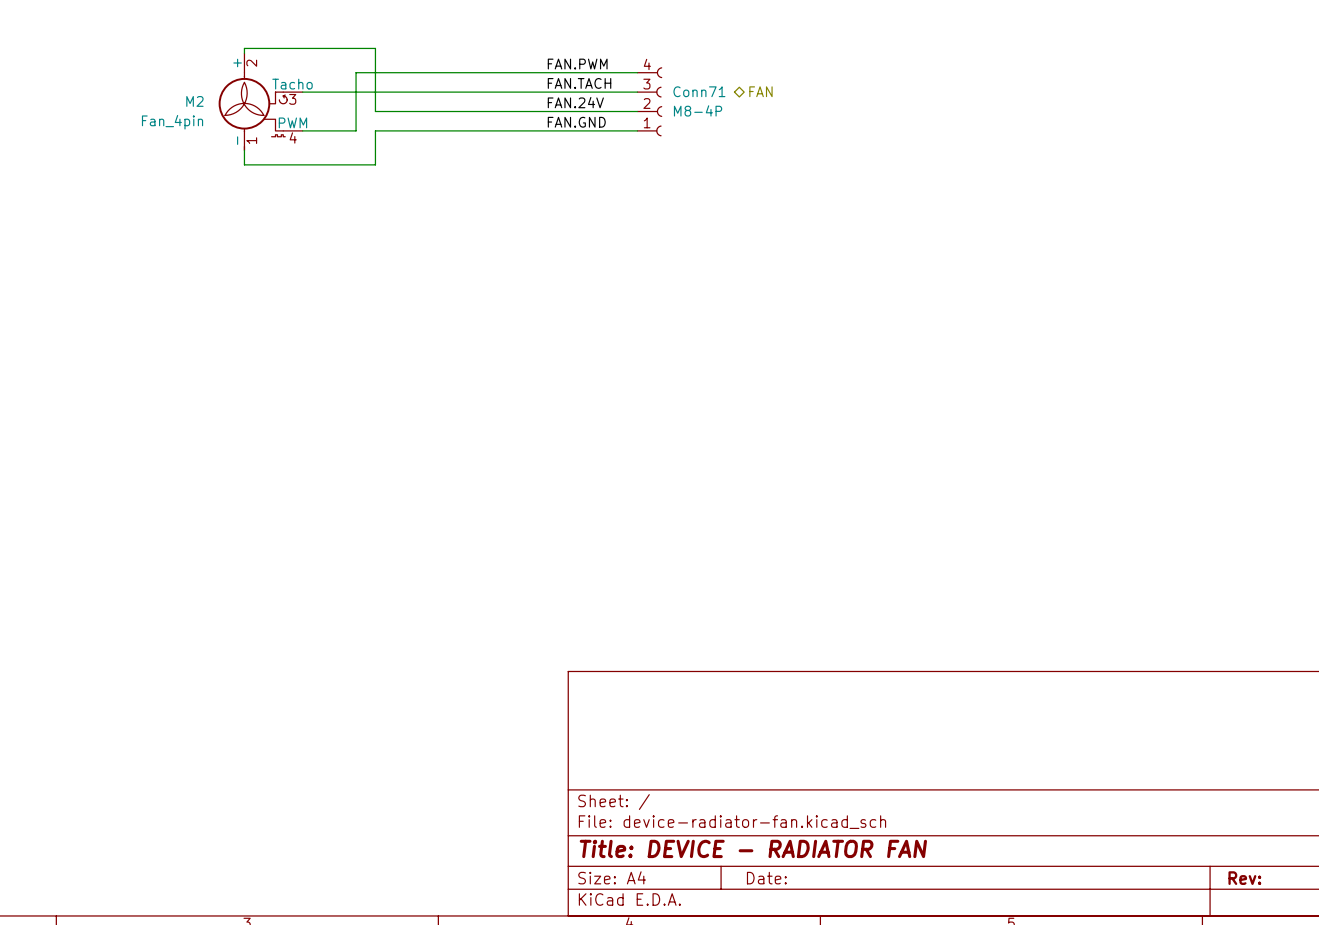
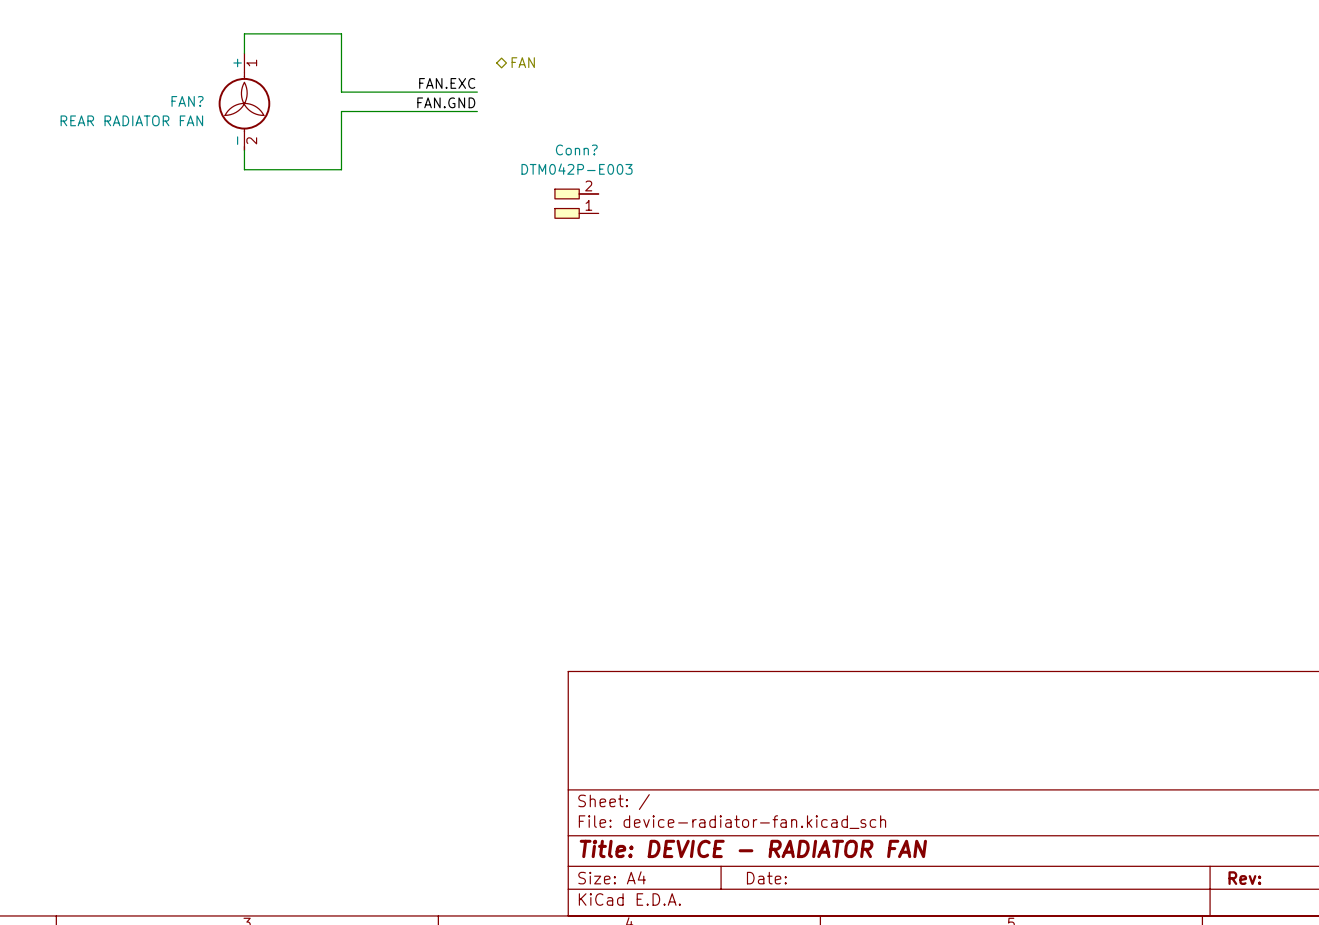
wire: (244, 48) (375, 48) (375, 111) -> (244, 48) (244, 33) (341, 33) (341, 92)
hierarchical label: none -> FAN (523, 62)
label: FAN.PWM (577, 64) -> none
wire: (637, 72) (356, 72) (356, 130) (302, 130) -> none
label: none -> FAN.EXC (447, 83)
label: FAN.TACH (579, 83) -> none
hierarchical label: FAN (760, 91) -> none
wire: (302, 92) (341, 92) -> none
wire: (477, 92) (637, 92) -> none
FAN?: none -> REAR RADIATOR FAN (244, 101)
M2: Fan_4pin (260, 101) -> none
Conn71: (649, 101) -> none
label: FAN.24V (575, 102) -> none
wire: (477, 111) (637, 111) -> none
label position: FAN.GND (576, 122) -> FAN.GND (446, 102)
wire: (637, 130) (375, 130) (375, 164) (244, 164) -> (375, 111) (341, 111) (341, 169) (244, 169) (244, 164)
Conn?: none -> (576, 203)

